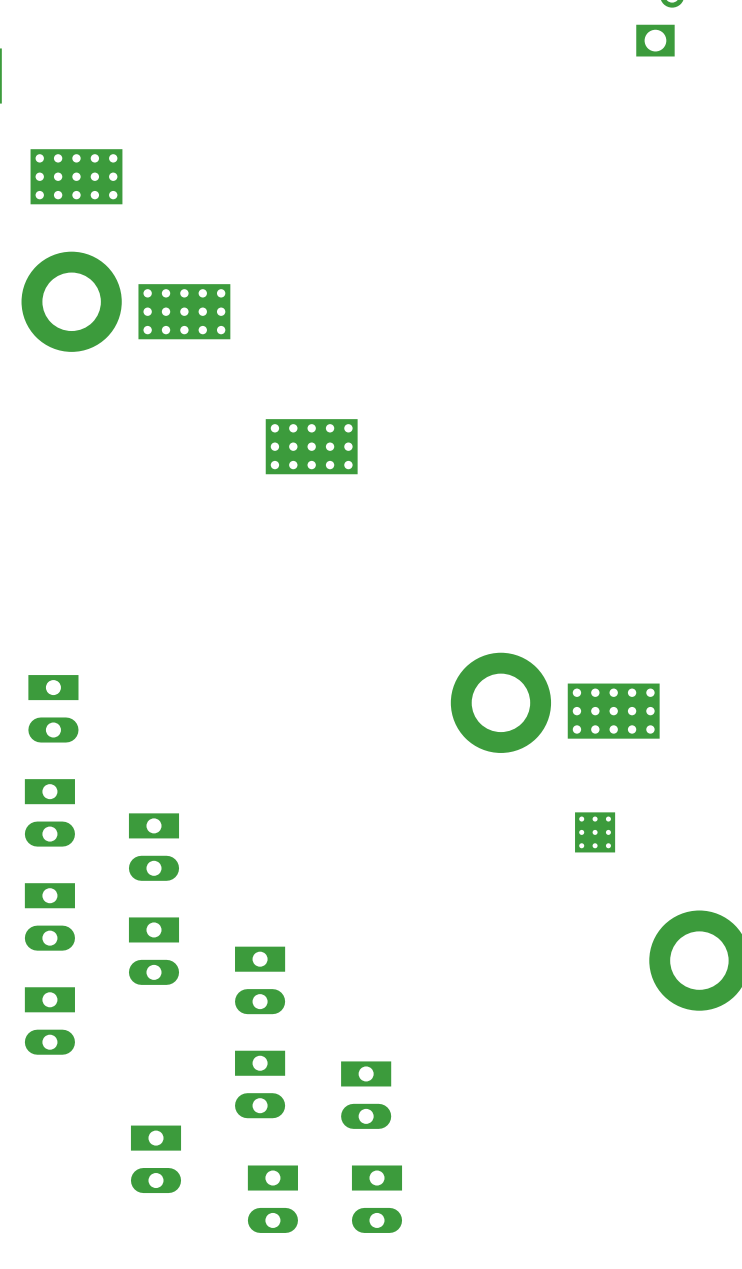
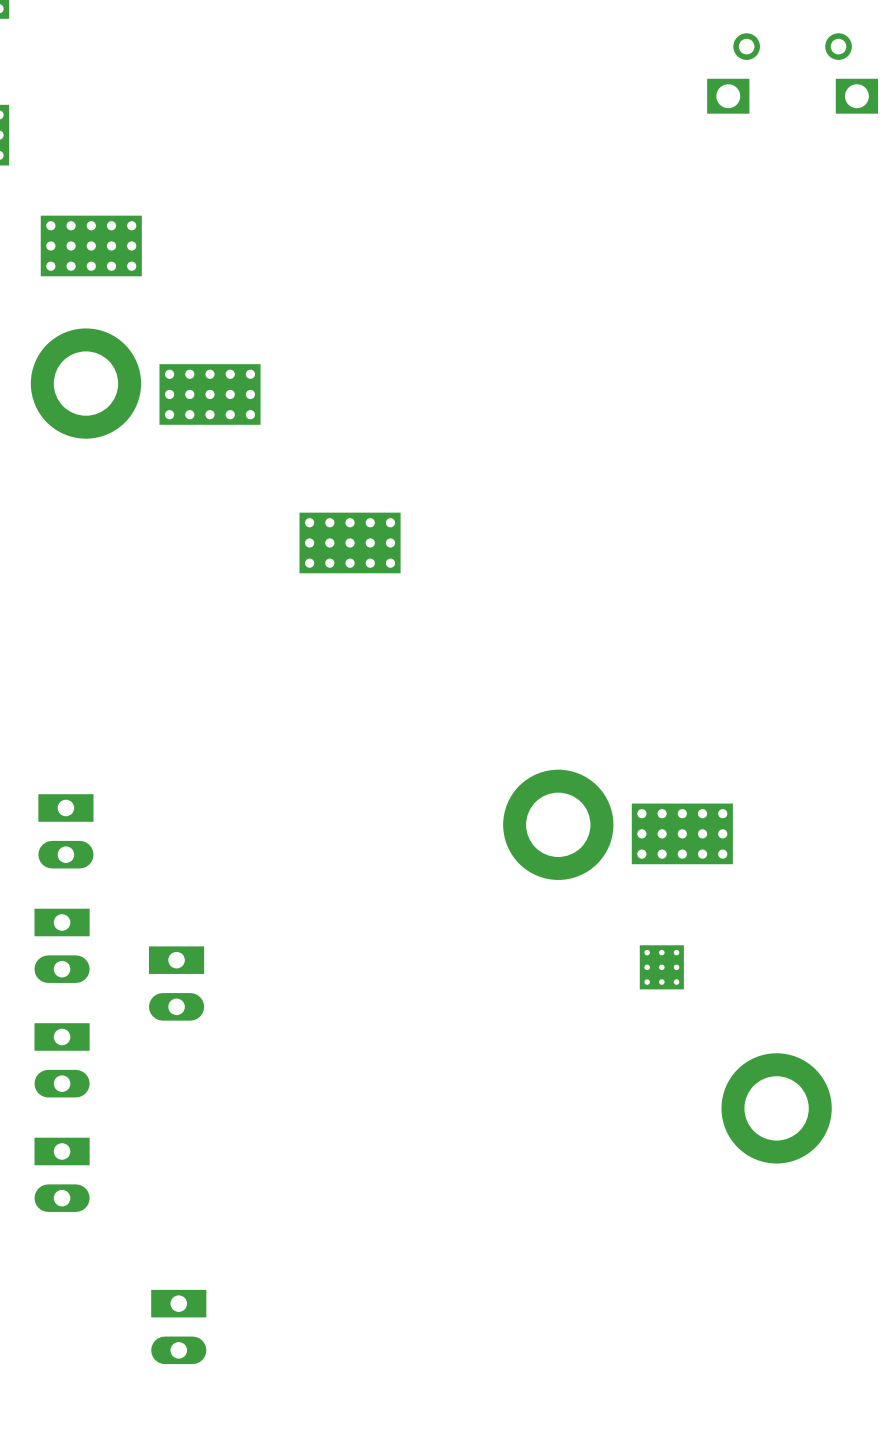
part: (153, 951) -> none
part: (260, 980) -> none
part: (260, 1084) -> none
part: (366, 1095) -> none
part: (272, 1199) -> none
part: (377, 1199) -> none

